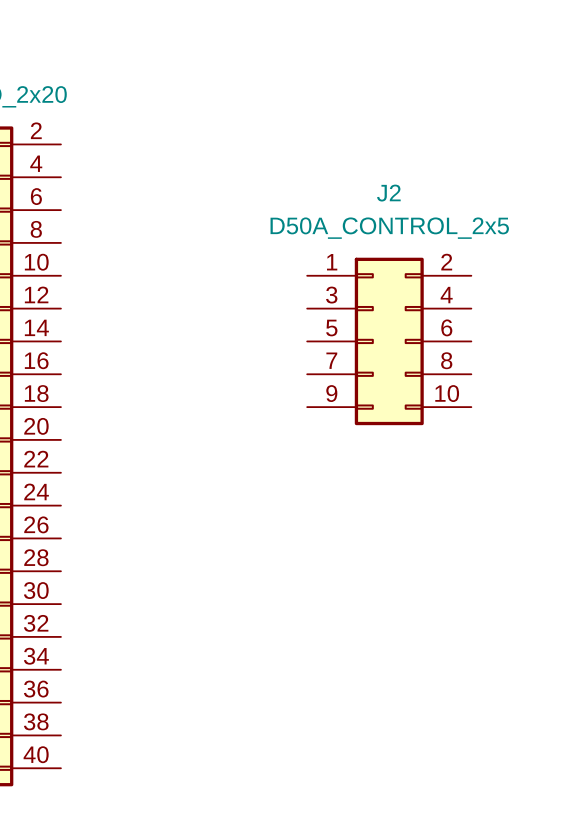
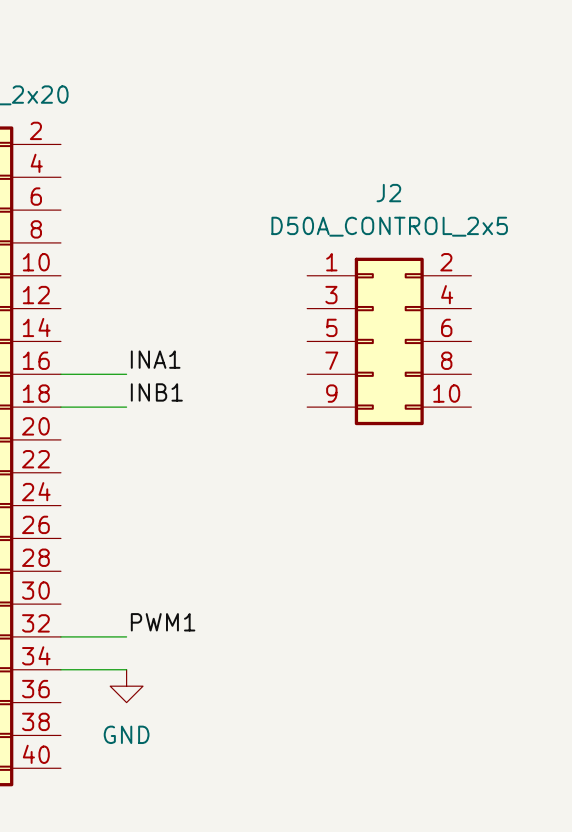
label: none -> INA1 (155, 359)
wire: none -> (60, 374) (126, 374)
label: none -> INB1 (156, 392)
wire: none -> (60, 407) (126, 407)
label: none -> PWM1 (163, 622)
wire: none -> (60, 636) (126, 636)
wire: none -> (60, 669) (126, 669)
power symbol: none -> GND (126, 686)

